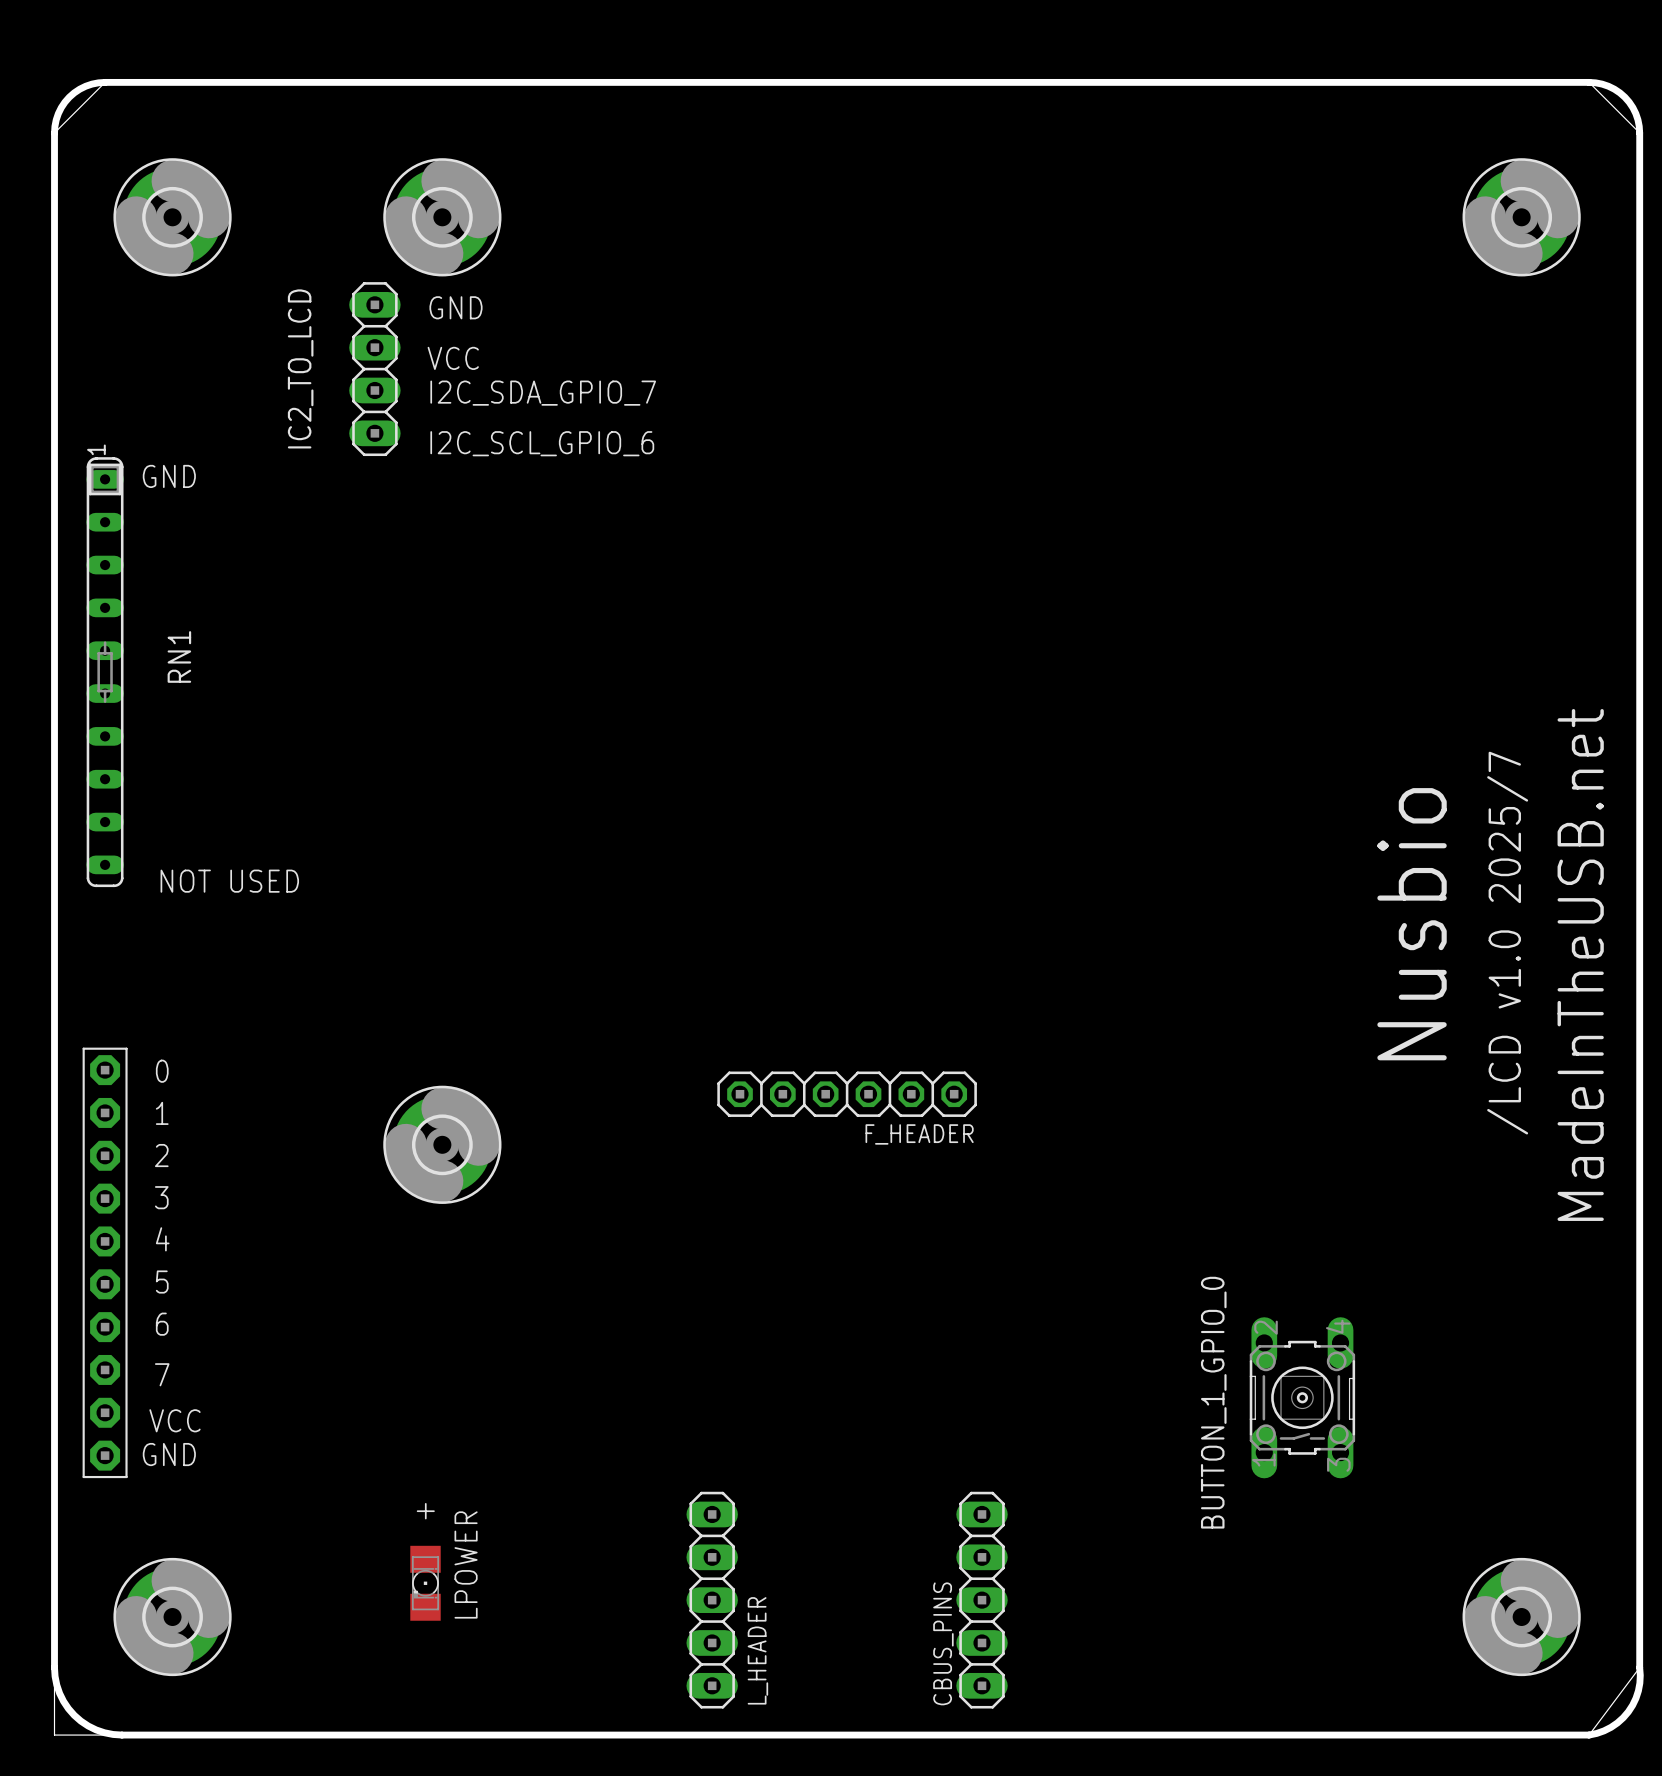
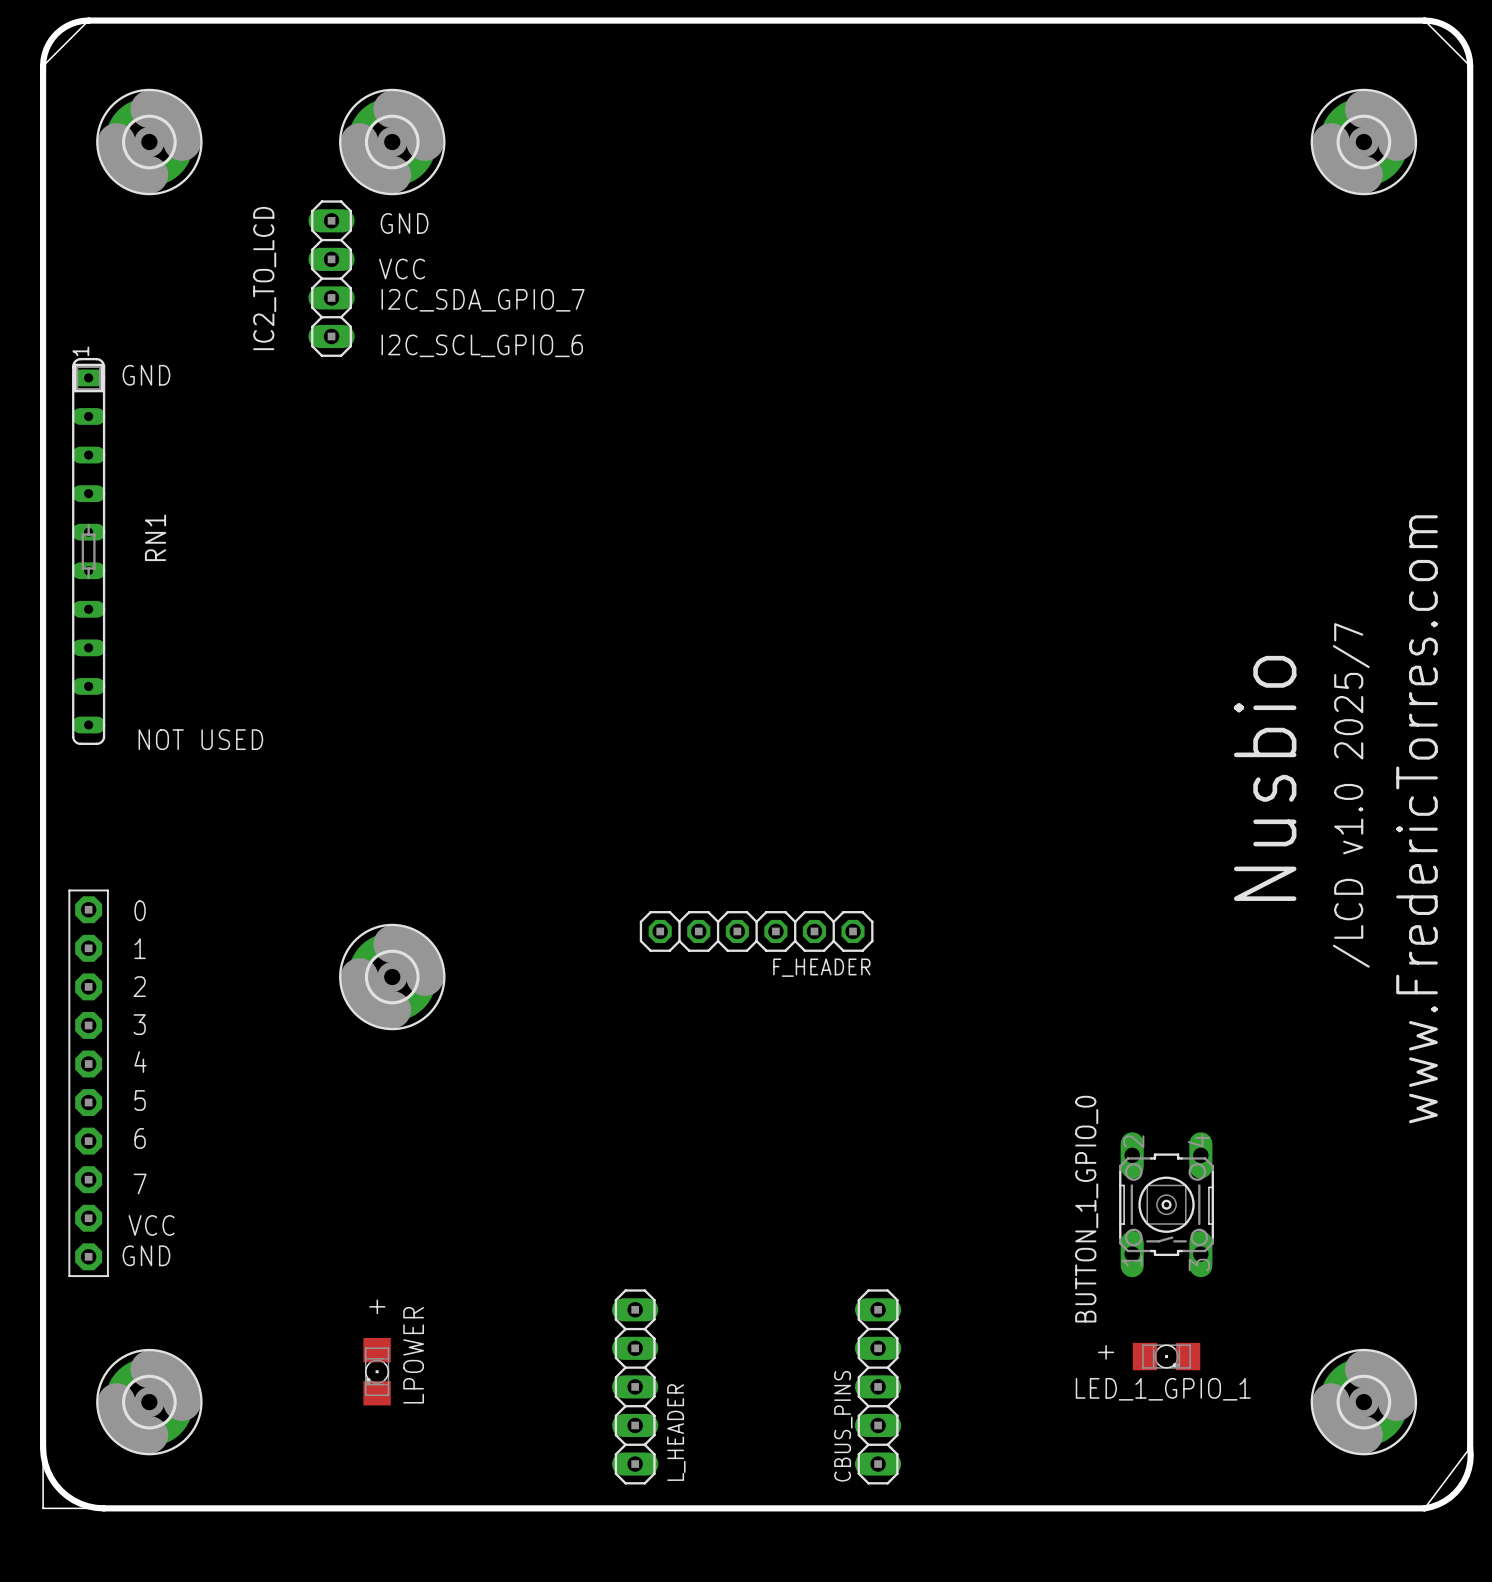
text: MadeInTheUSB.net (1580, 965) -> www.FredericTorres.com (1417, 819)
text: none -> + (1106, 1352)
LED_1_GPIO_1: none -> (1166, 1356)

